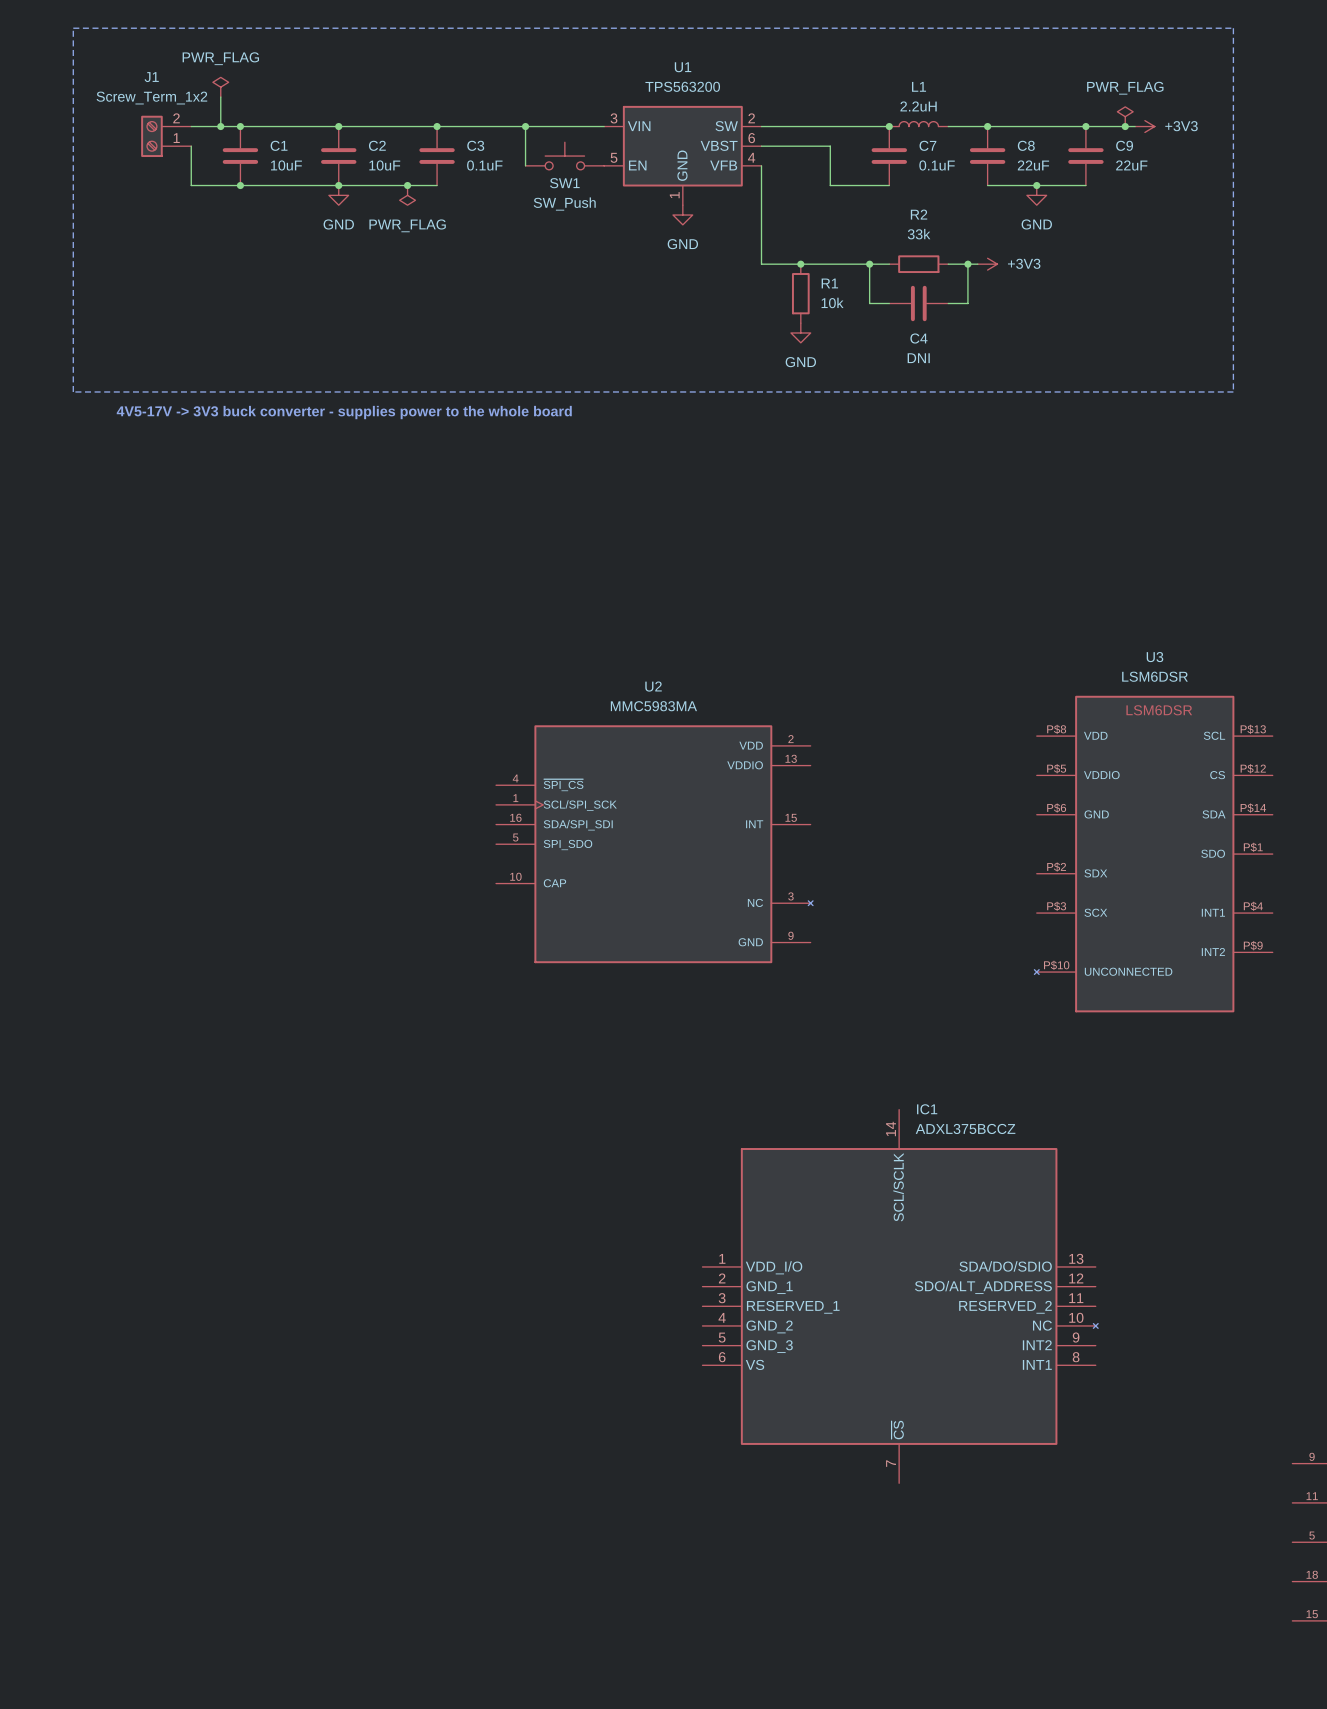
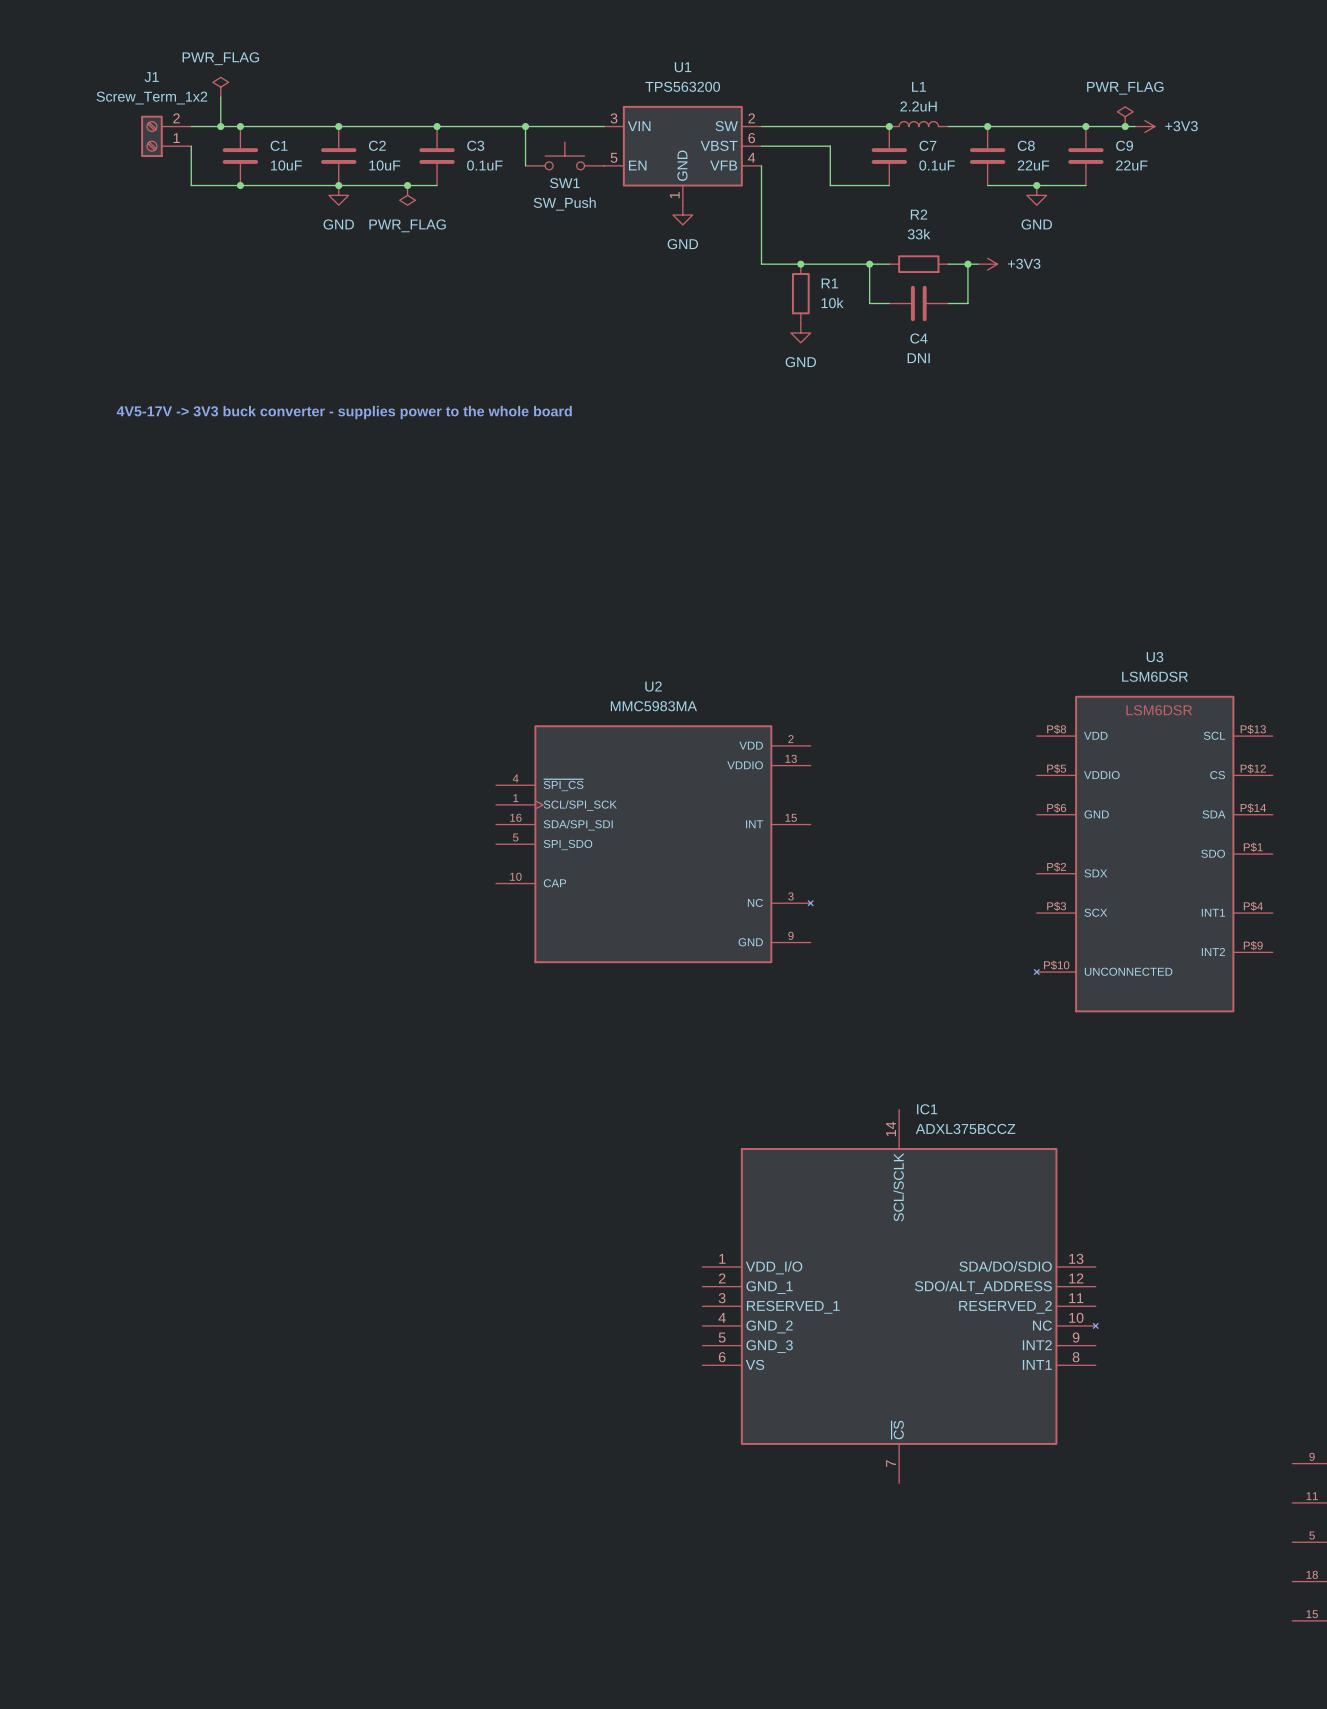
line: (73, 28) (1233, 28) (1233, 391) (73, 391) (73, 28) -> none

